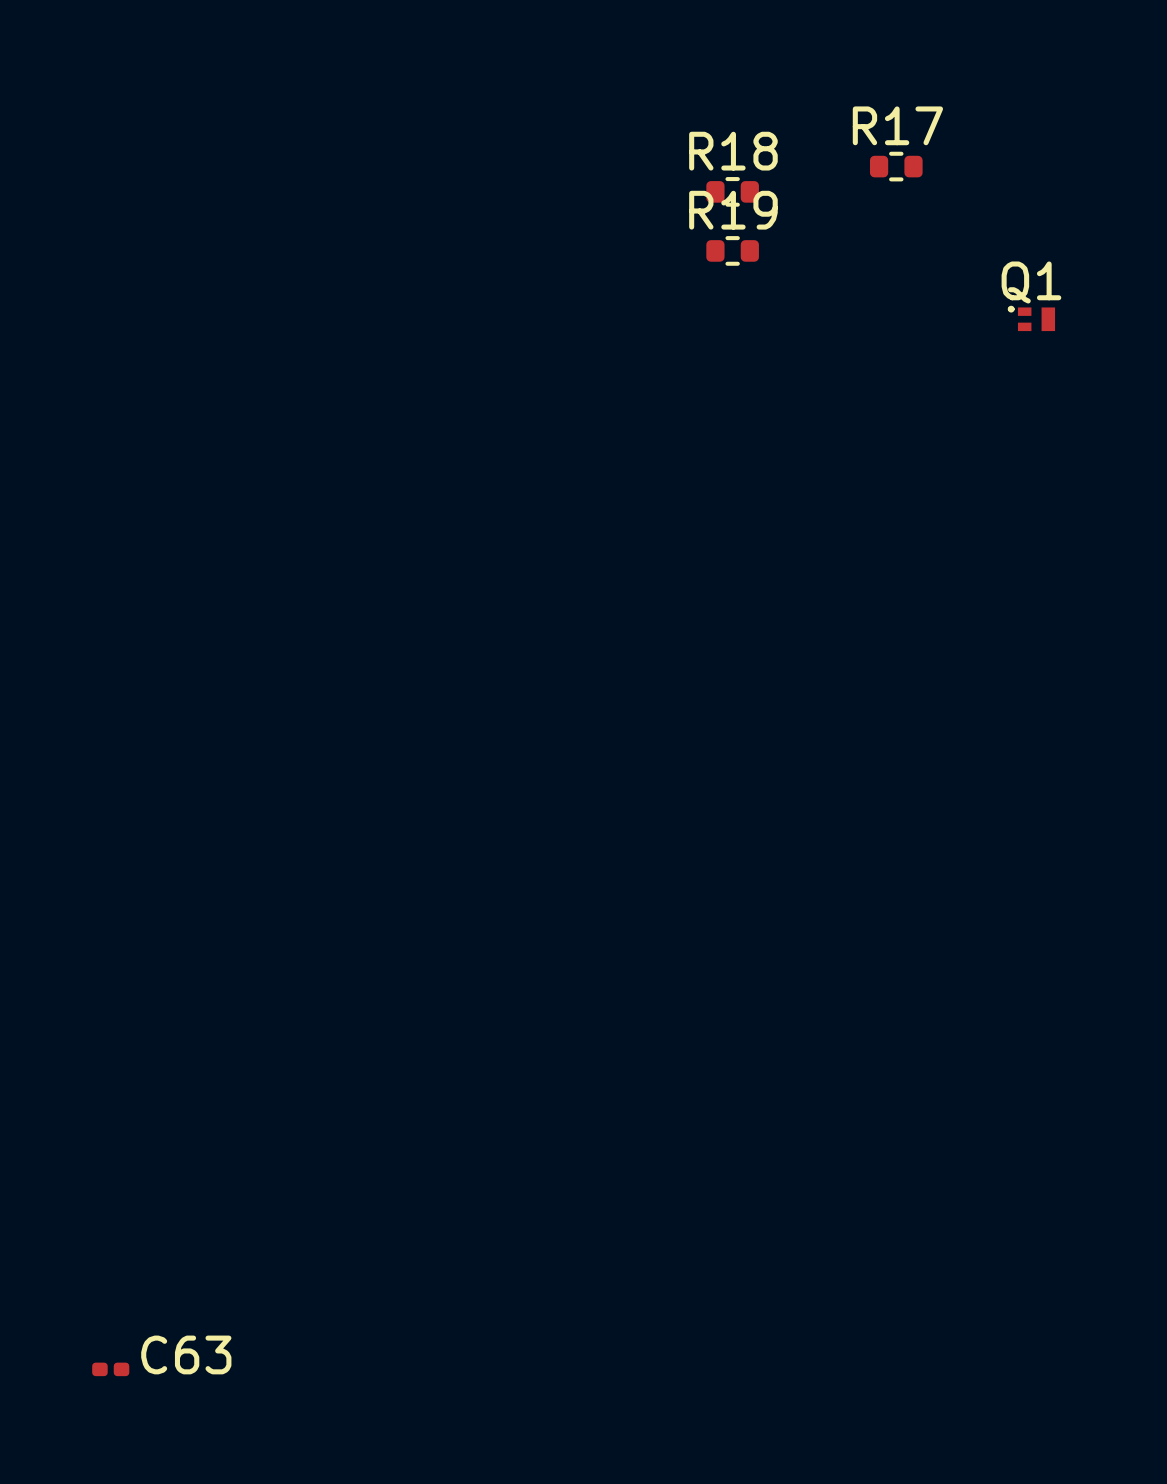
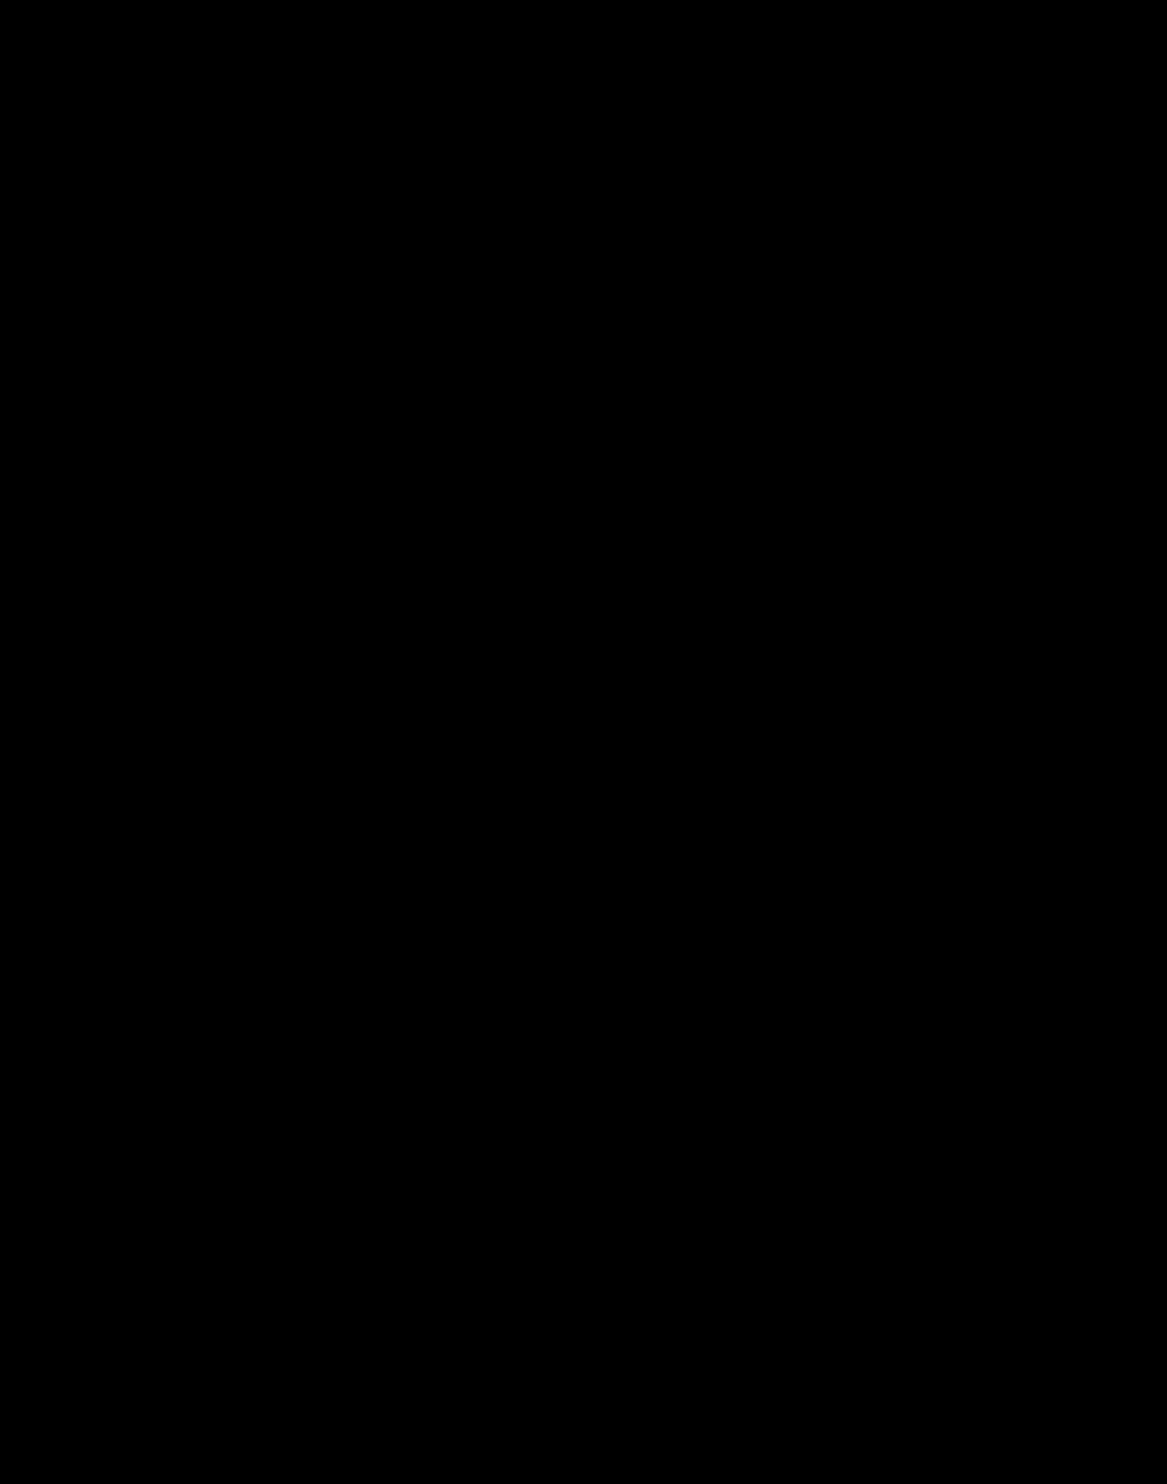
R17: (896, 166) -> none
R18: (732, 191) -> none
R19: (732, 250) -> none
Q1: (1031, 318) -> none
C63: (110, 1369) -> none

